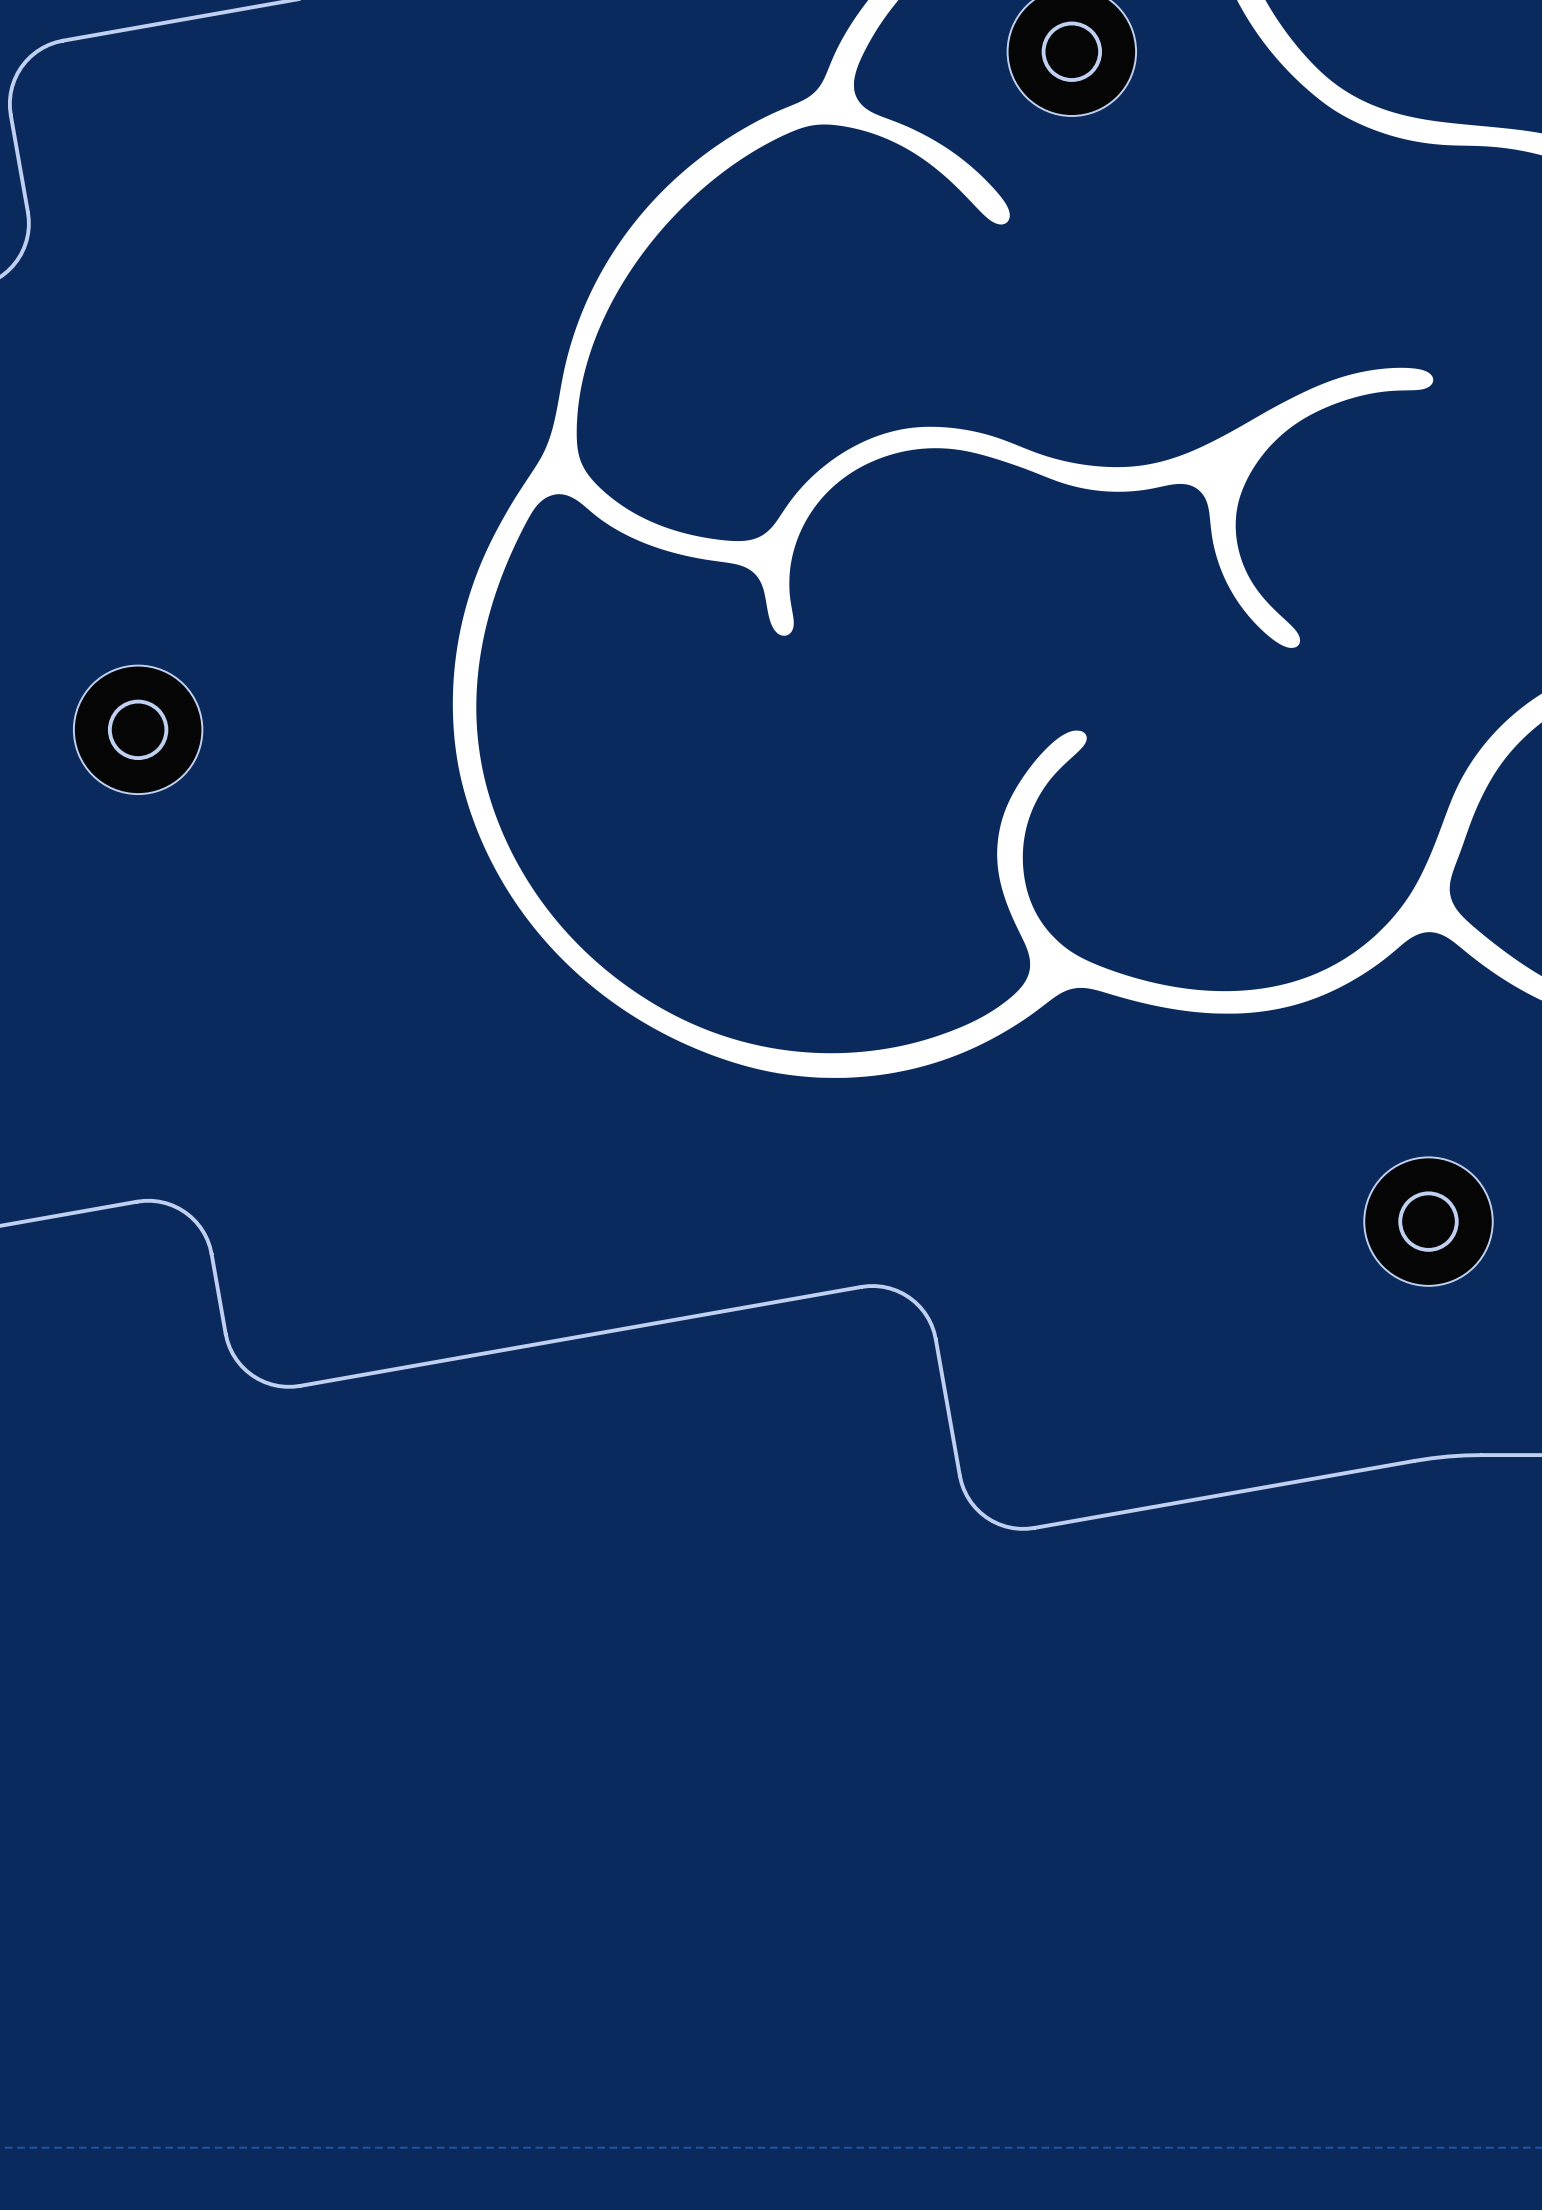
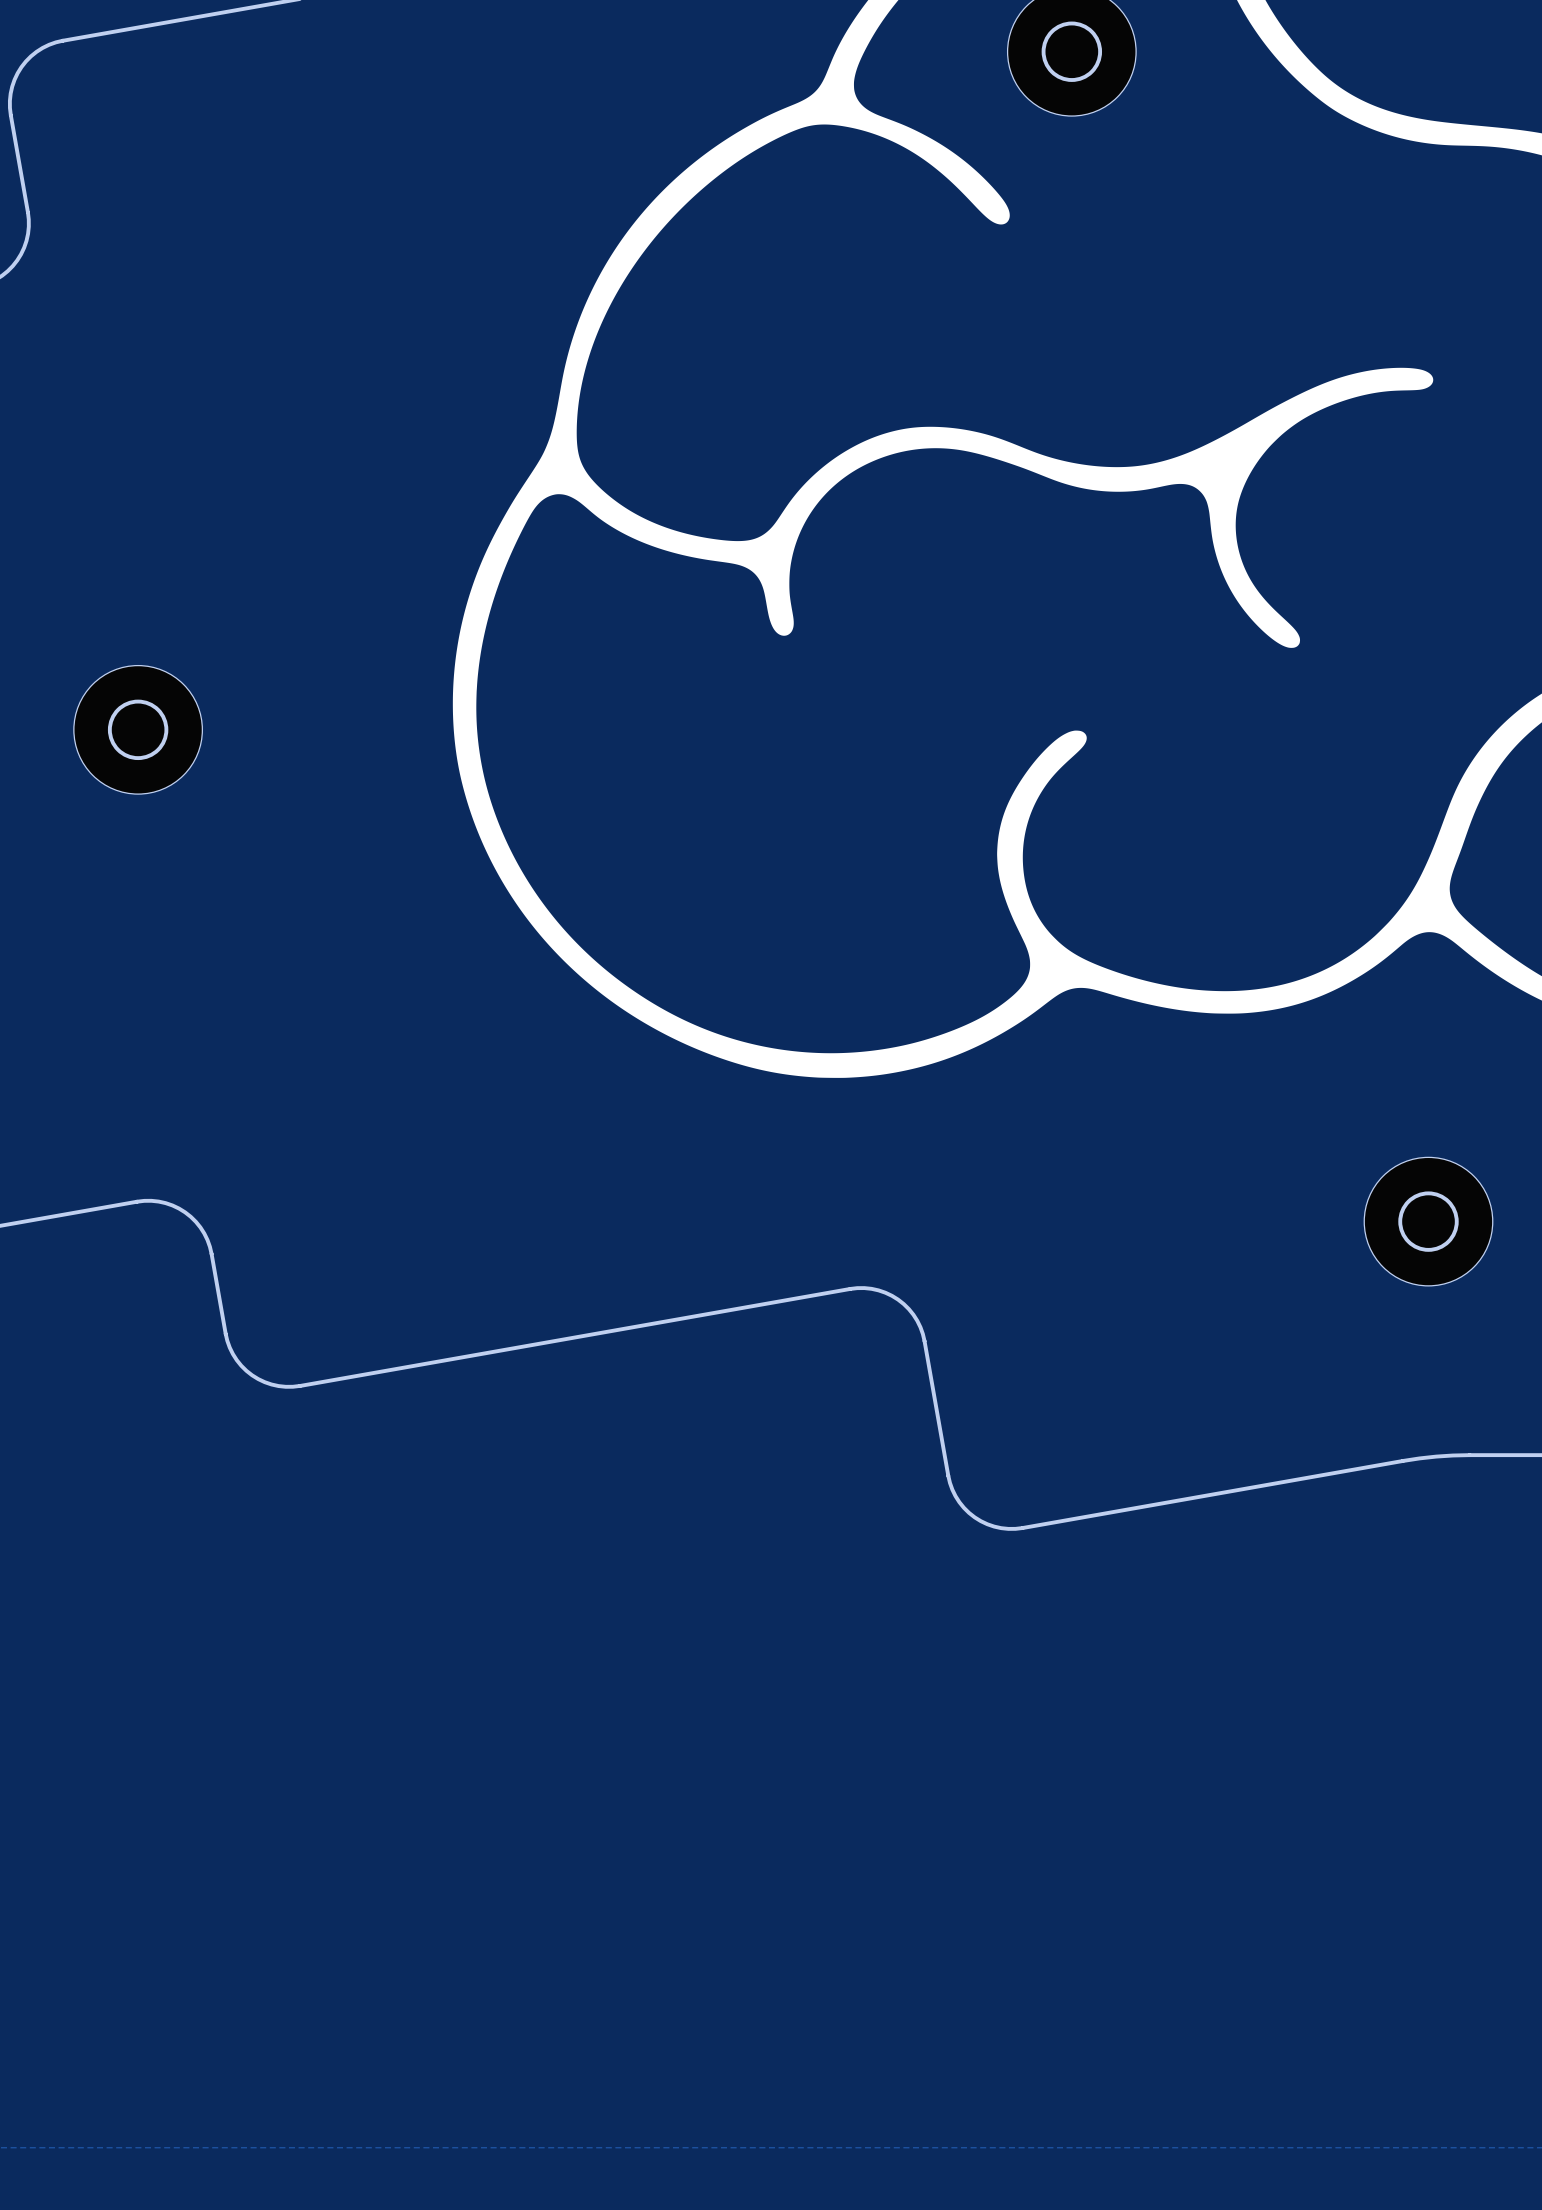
board edge: (850, 1288) (868, 1286) (889, 1288) (909, 1297) (924, 1312) (931, 1325) (935, 1339) (963, 1489) (970, 1502) (980, 1512) (992, 1521) (1005, 1526) (1019, 1528) (1034, 1527) (1414, 1460) (1481, 1455) -> (850, 1288) (871, 1288) (892, 1295) (903, 1304) (917, 1320) (924, 1341) (952, 1489) (959, 1502) (969, 1512) (980, 1521) (994, 1526) (1008, 1528) (1022, 1528) (1419, 1458) (1481, 1455)

